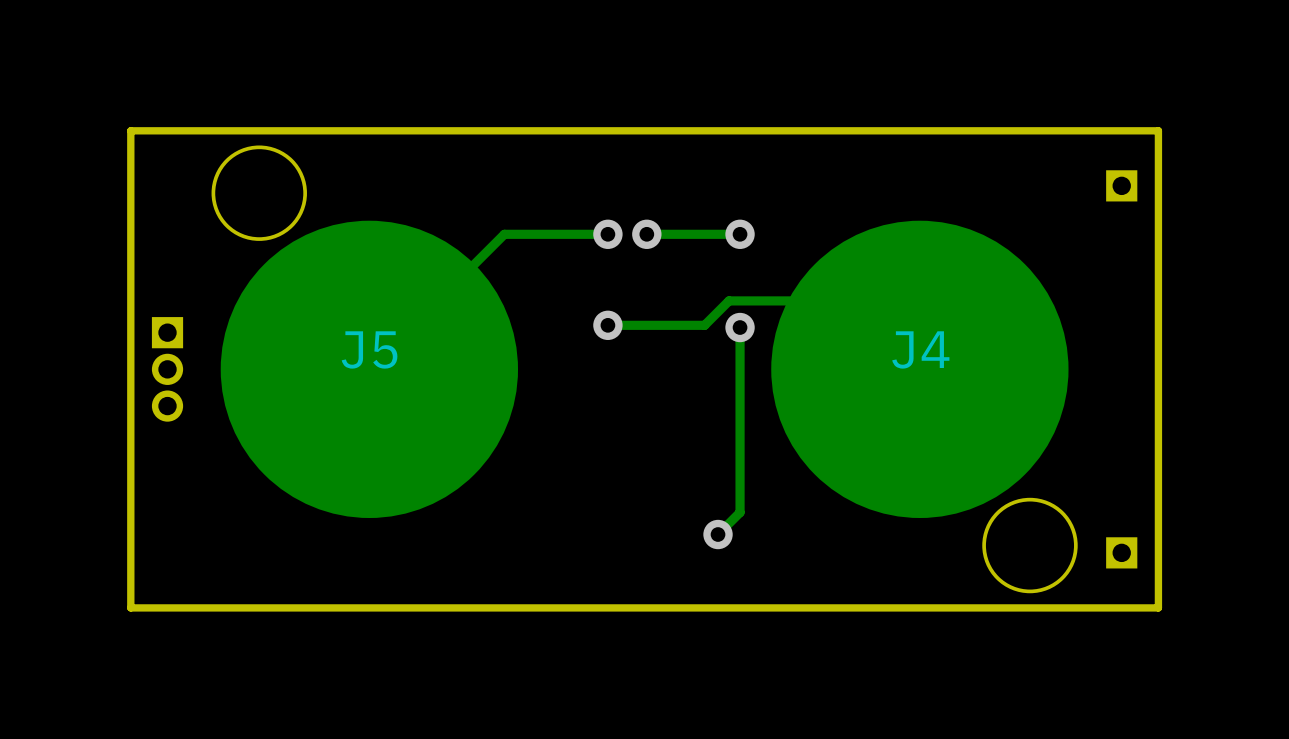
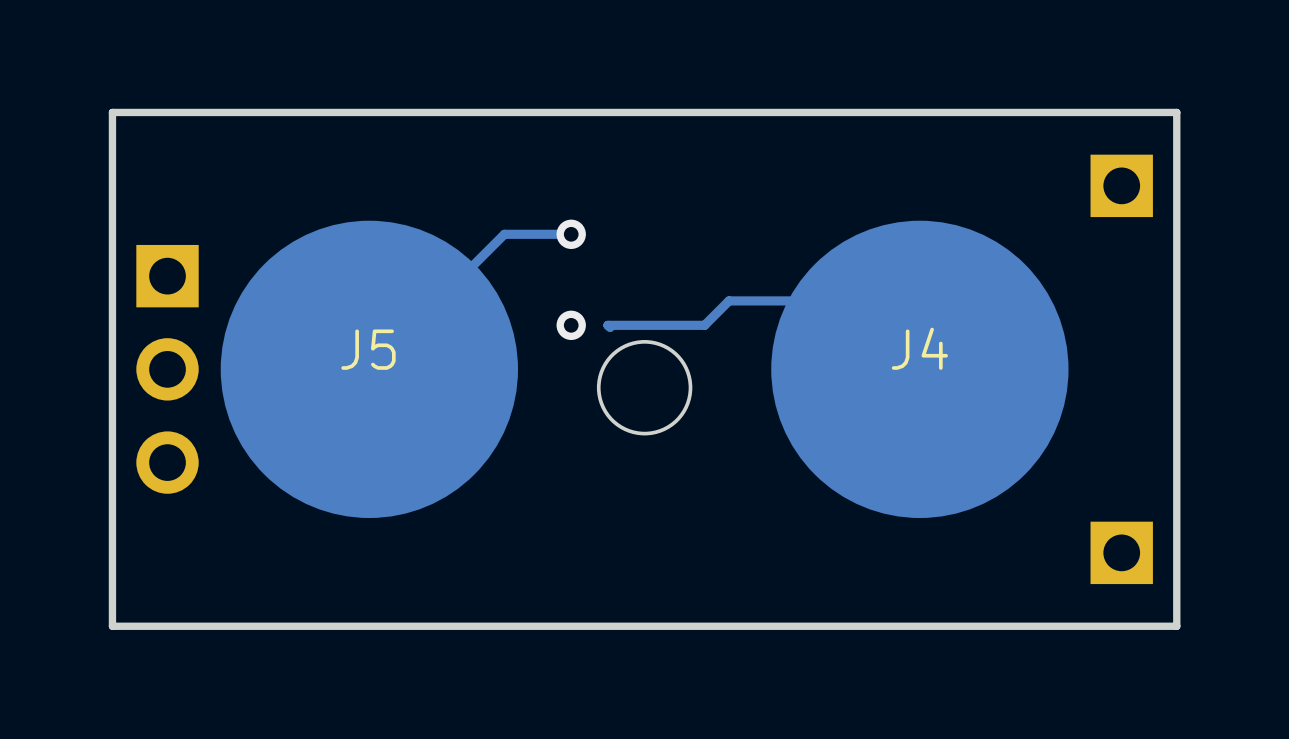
board edge: (1158, 130) (130, 130) (130, 607) (1158, 607) (1158, 130) -> (1176, 112) (1176, 626) (112, 626) (112, 112) (1176, 112)
round board edge: [211, 145, 307, 241] -> none
part footprint: [1106, 170, 1138, 202] -> [1090, 154, 1153, 218]
track: (607, 234) (571, 234) -> none
via position: (607, 234) -> (571, 234)
via: (646, 234) -> none
track: (740, 234) (646, 234) -> none
via: (740, 234) -> none
part footprint: [151, 317, 184, 422] -> [136, 244, 199, 494]
via position: (607, 325) -> (571, 325)
track: (740, 327) (740, 512) (718, 534) -> none
via: (740, 327) -> none
round board edge: none -> [596, 340, 693, 436]
round board edge: [982, 497, 1078, 594] -> none
via: (718, 534) -> none
part footprint: [1106, 537, 1138, 569] -> [1090, 521, 1153, 585]

